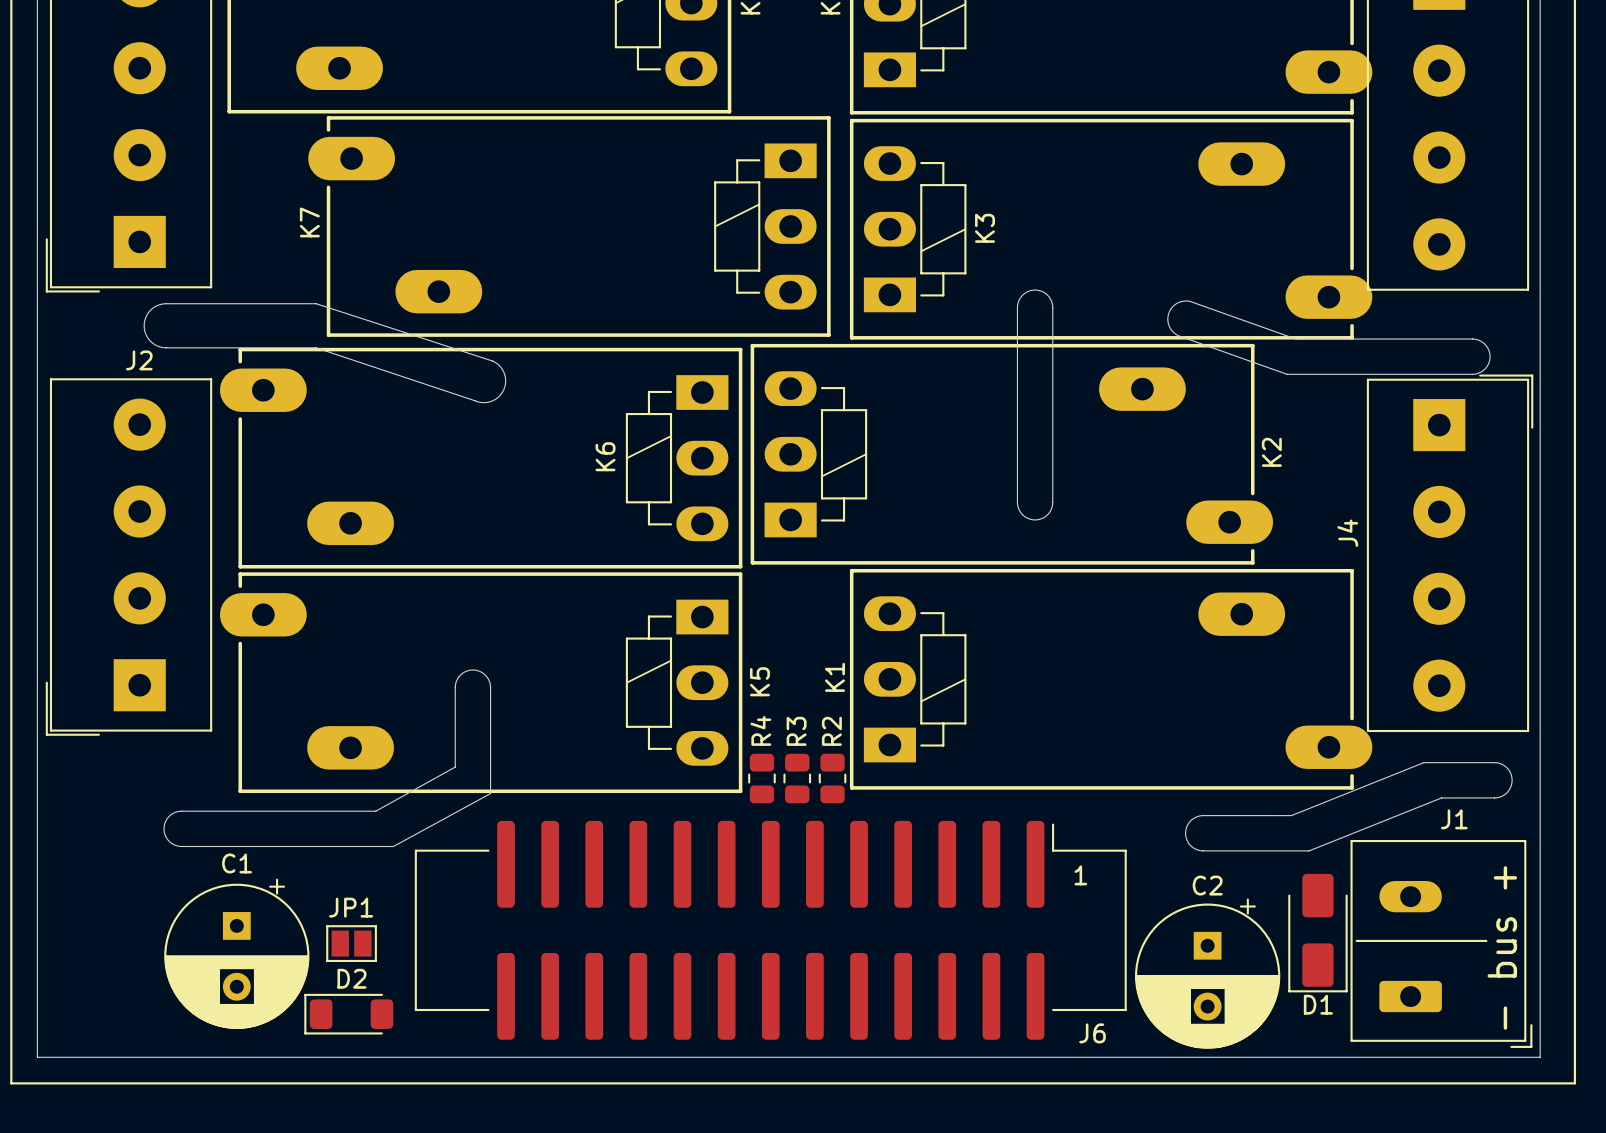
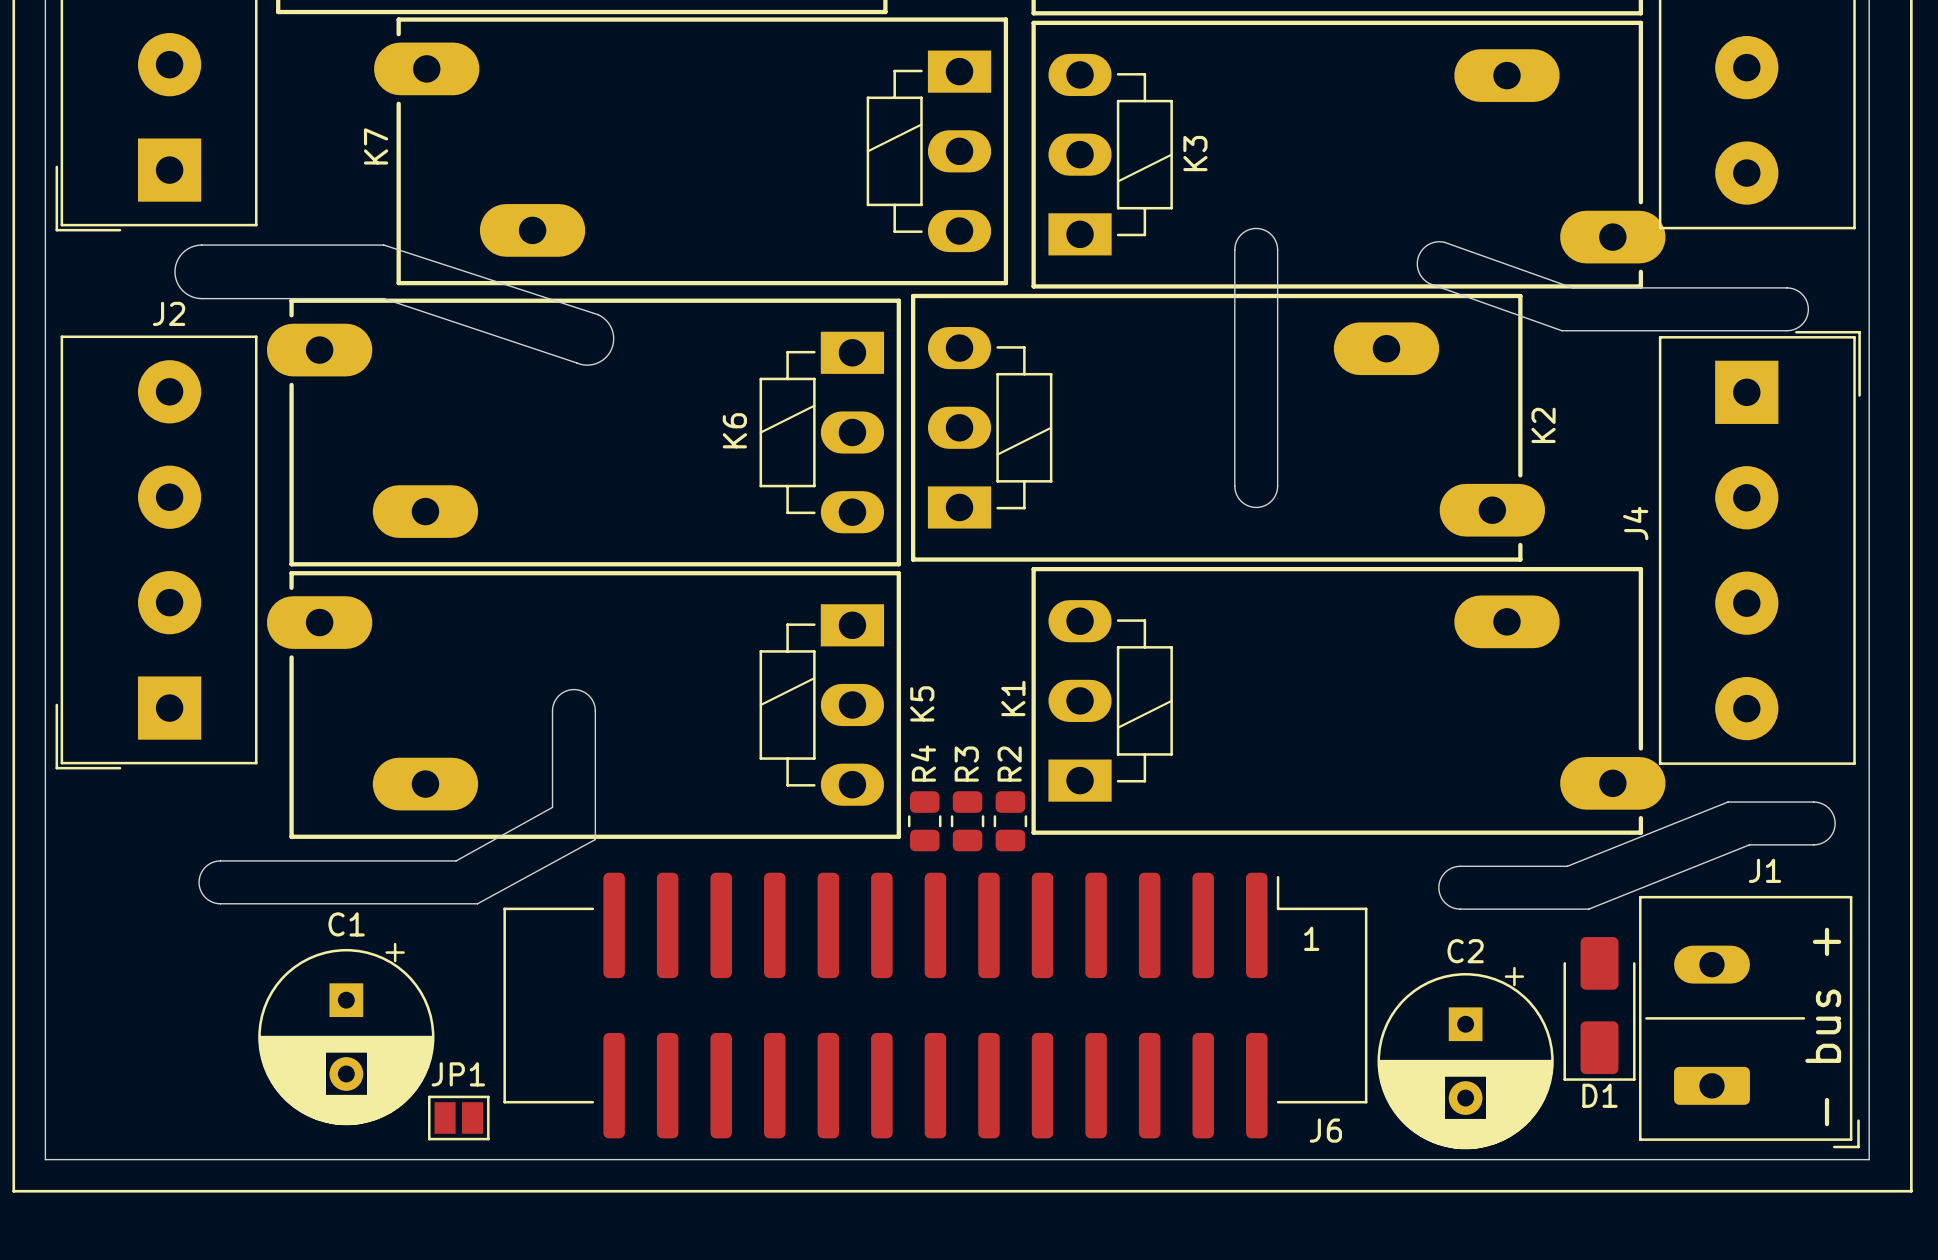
JP1 position: (351, 943) -> (458, 1118)
C1 position: (236, 953) -> (346, 1034)
D2: (348, 1014) -> none

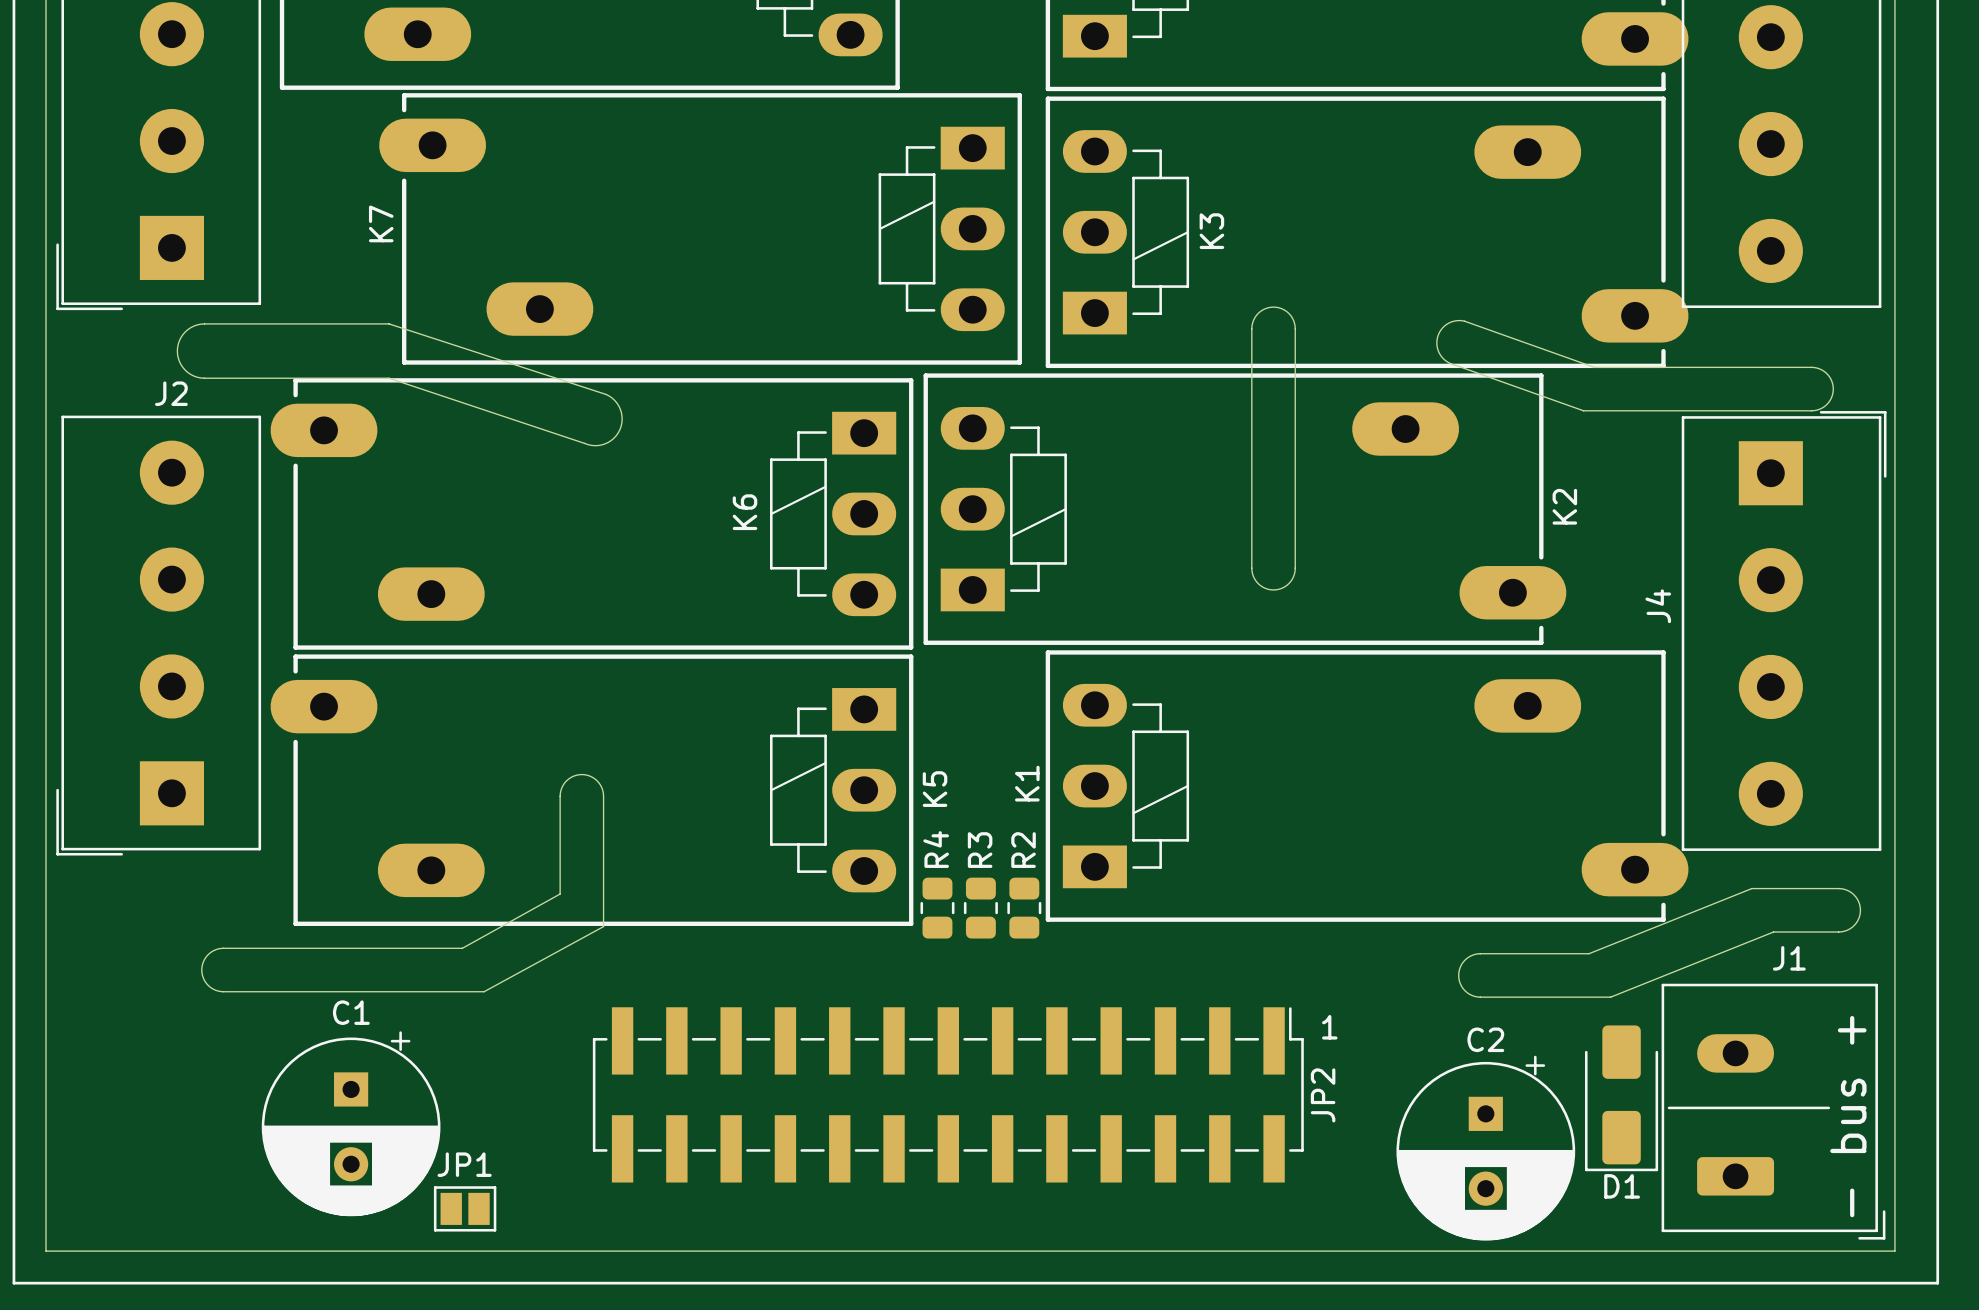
J6: (935, 1005) -> none
JP2: none -> (948, 1094)

